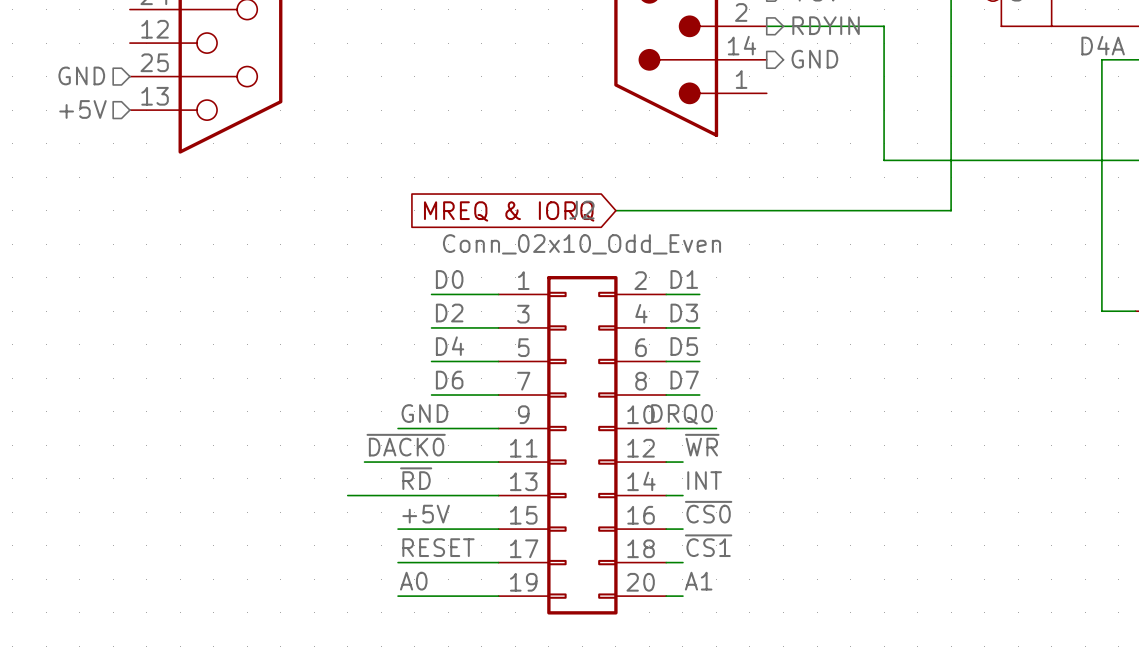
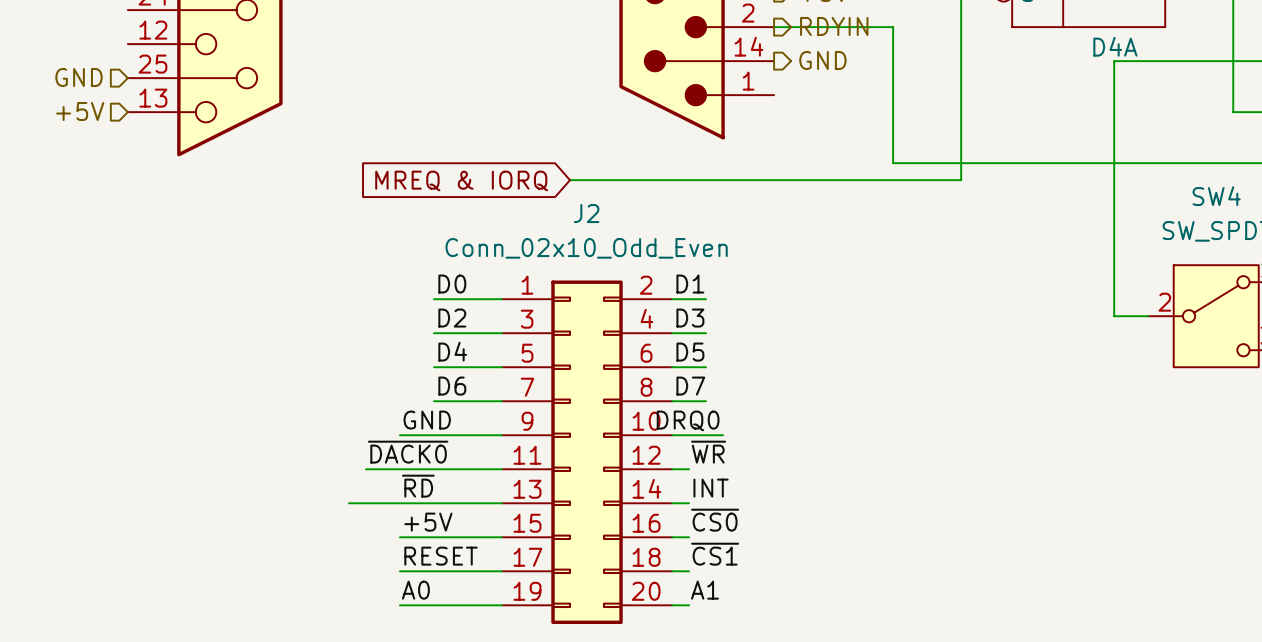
wire: (951, 177) (951, 210) (615, 210) -> (961, 180) (570, 180)
global label position: MREQ & IORQ (509, 211) -> MREQ & IORQ (461, 180)

